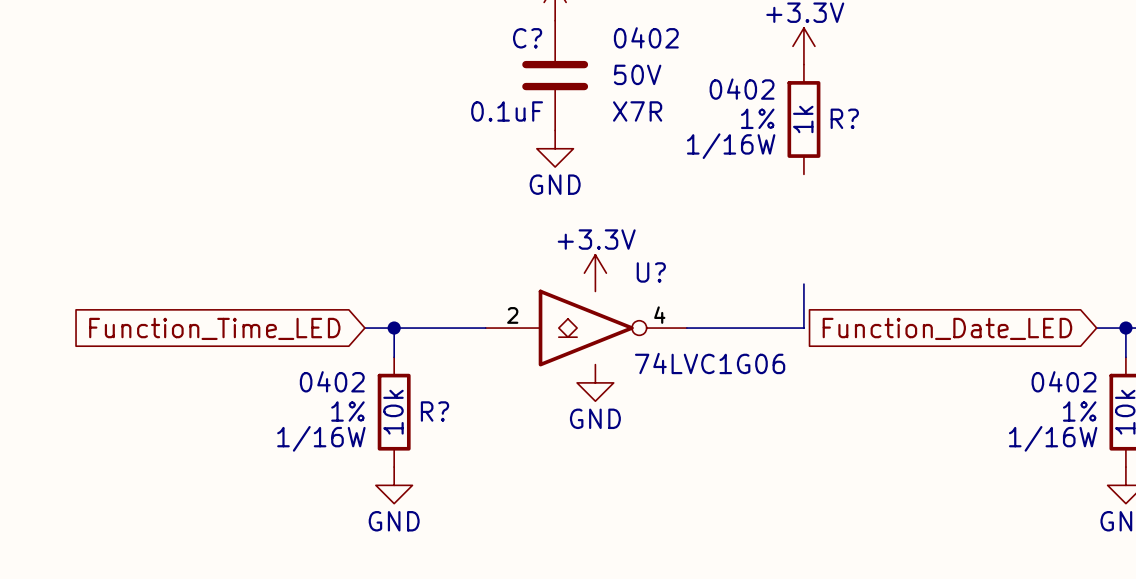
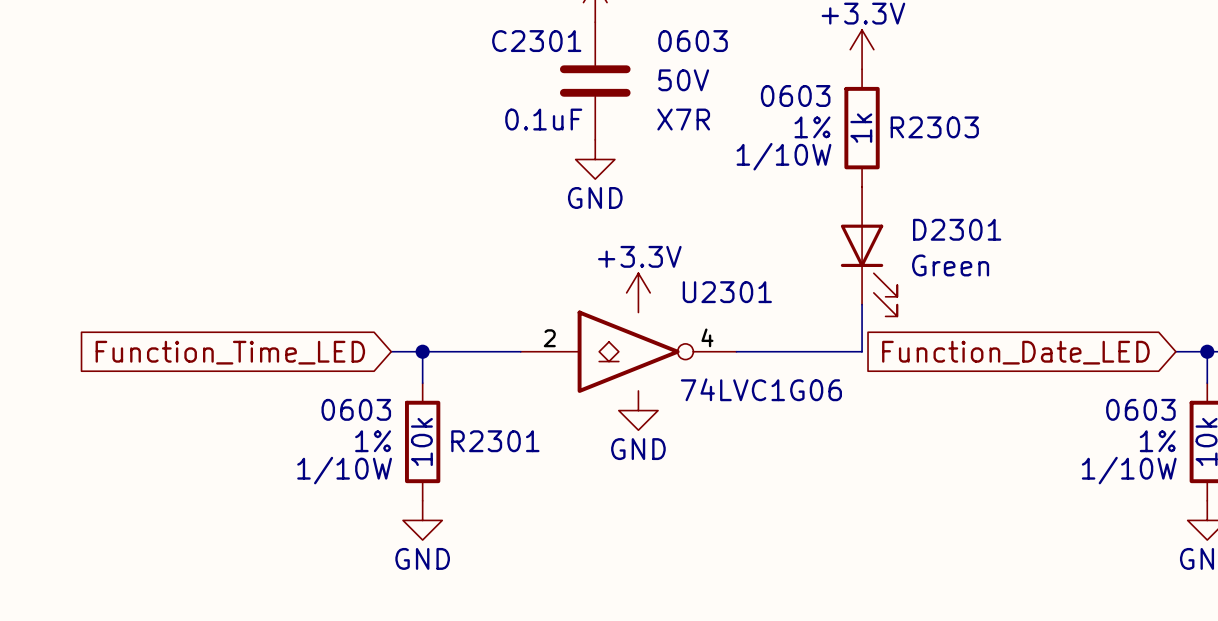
C? text: 0402 (646, 37) -> 0603 (693, 41)
C? name: C? (527, 38) -> C2301 (536, 41)
R? text: 0402 (742, 89) -> 0603 (795, 95)
R? name: R? (844, 118) -> R2303 (934, 127)
R? text: 1/16W (731, 146) -> 1/10W (783, 156)
D2301: none -> Green (869, 251)
U? name: U? (651, 272) -> U2301 (727, 292)
R? text: 0402 (332, 381) -> 0603 (356, 409)
part text: 0402 (1064, 381) -> 0603 (1140, 409)
R? name: R? (434, 411) -> R2301 (495, 441)
R? text: 1/16W (321, 438) -> 1/10W (344, 470)
part text: 1/16W (1053, 438) -> 1/10W (1129, 470)

